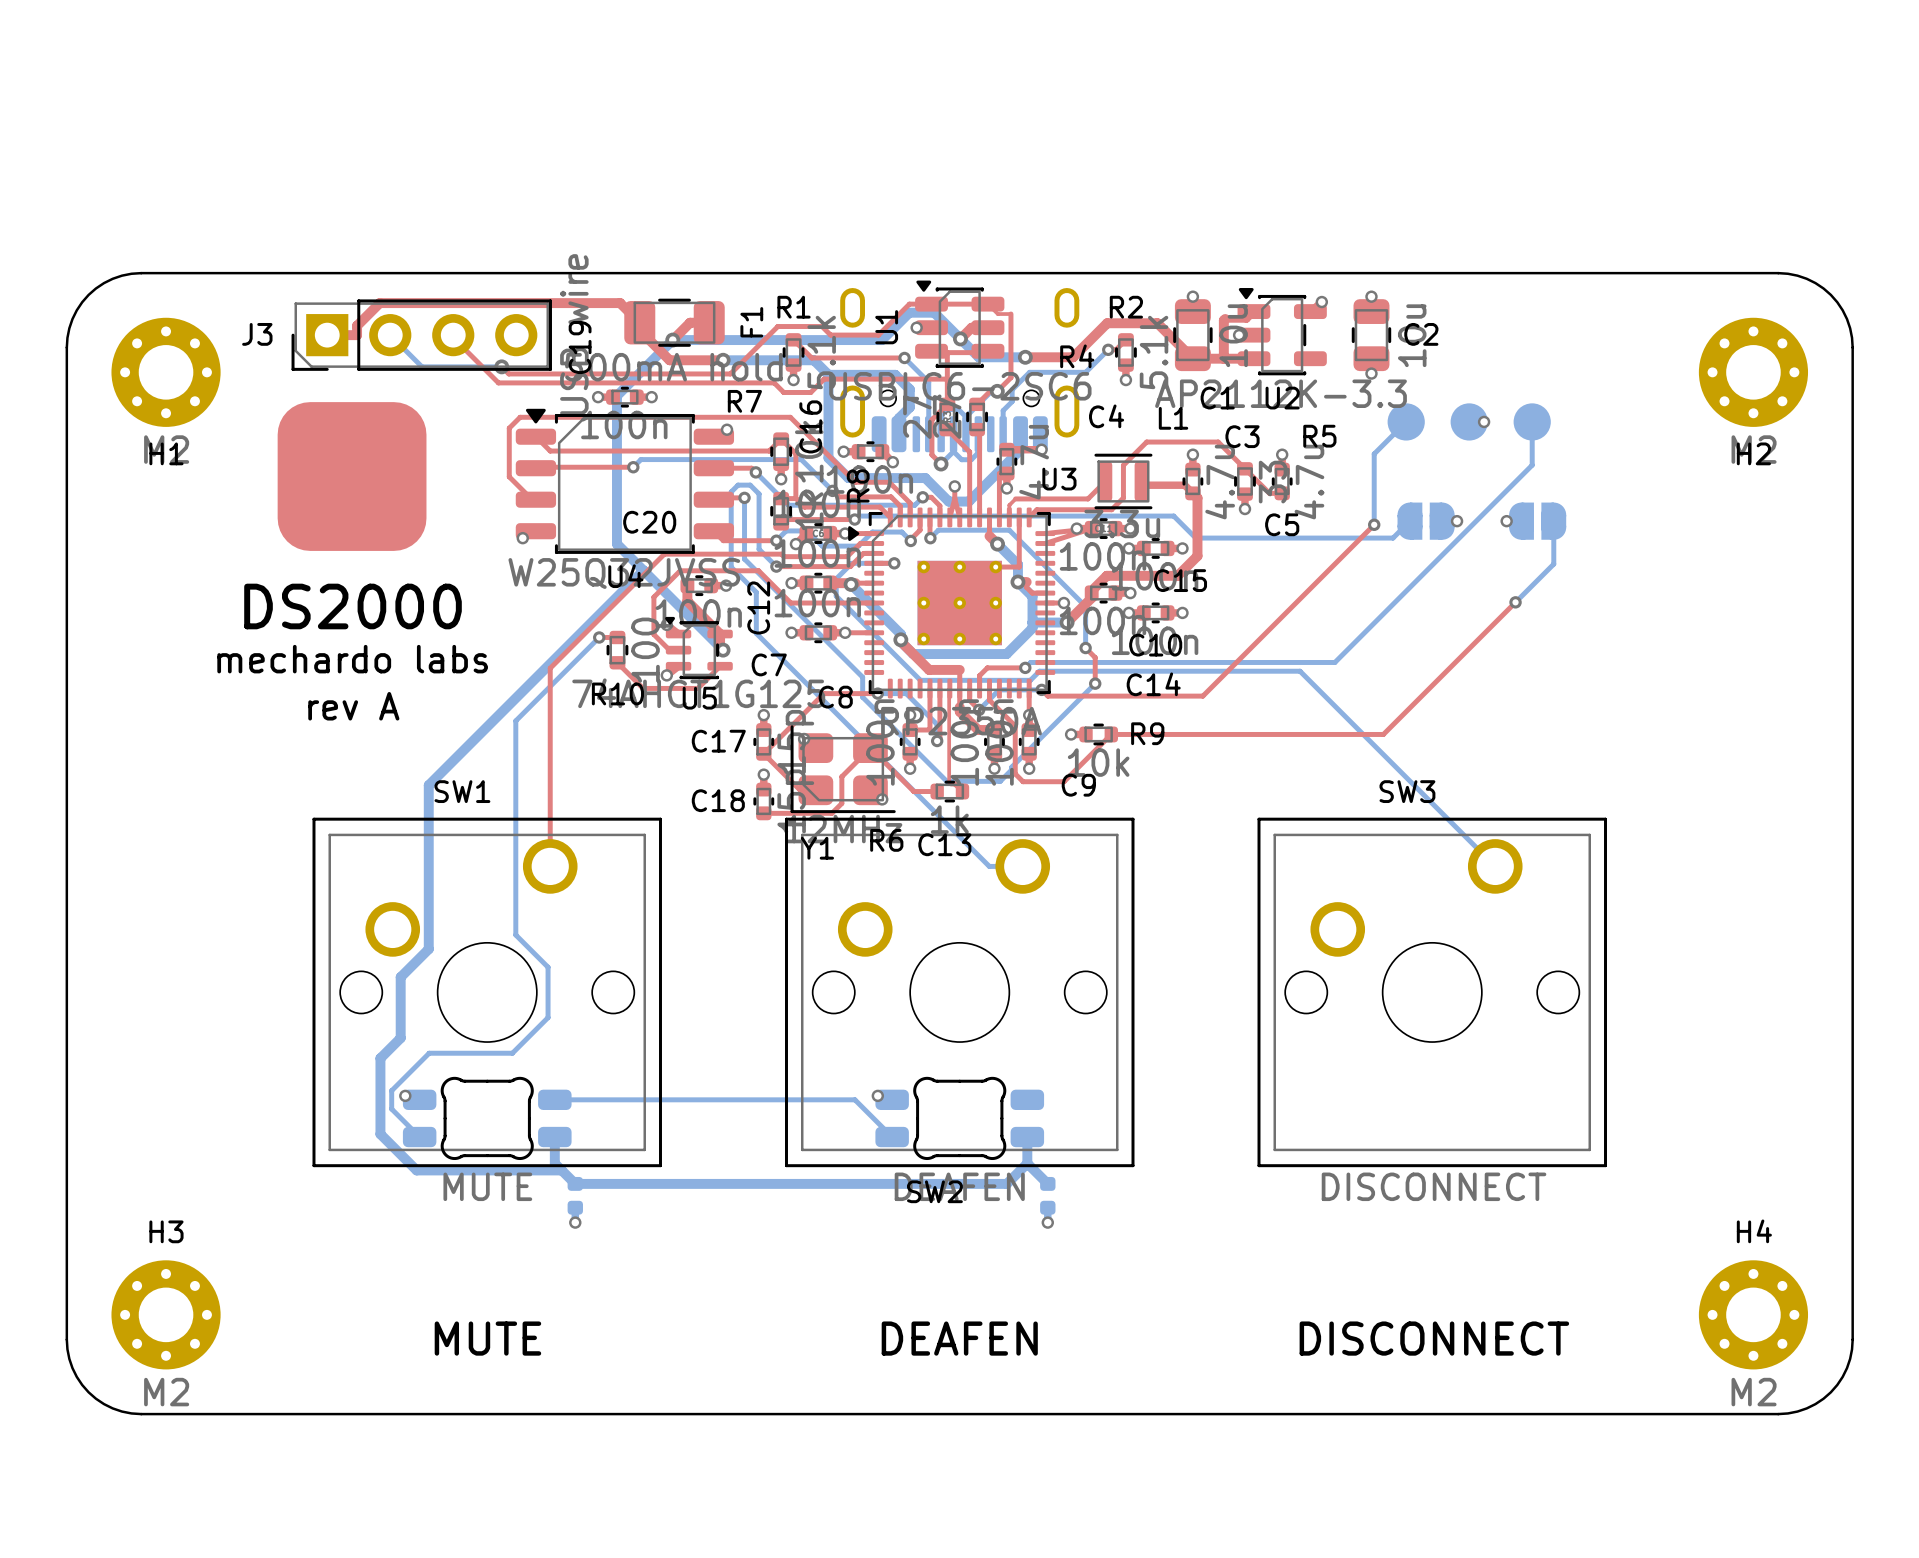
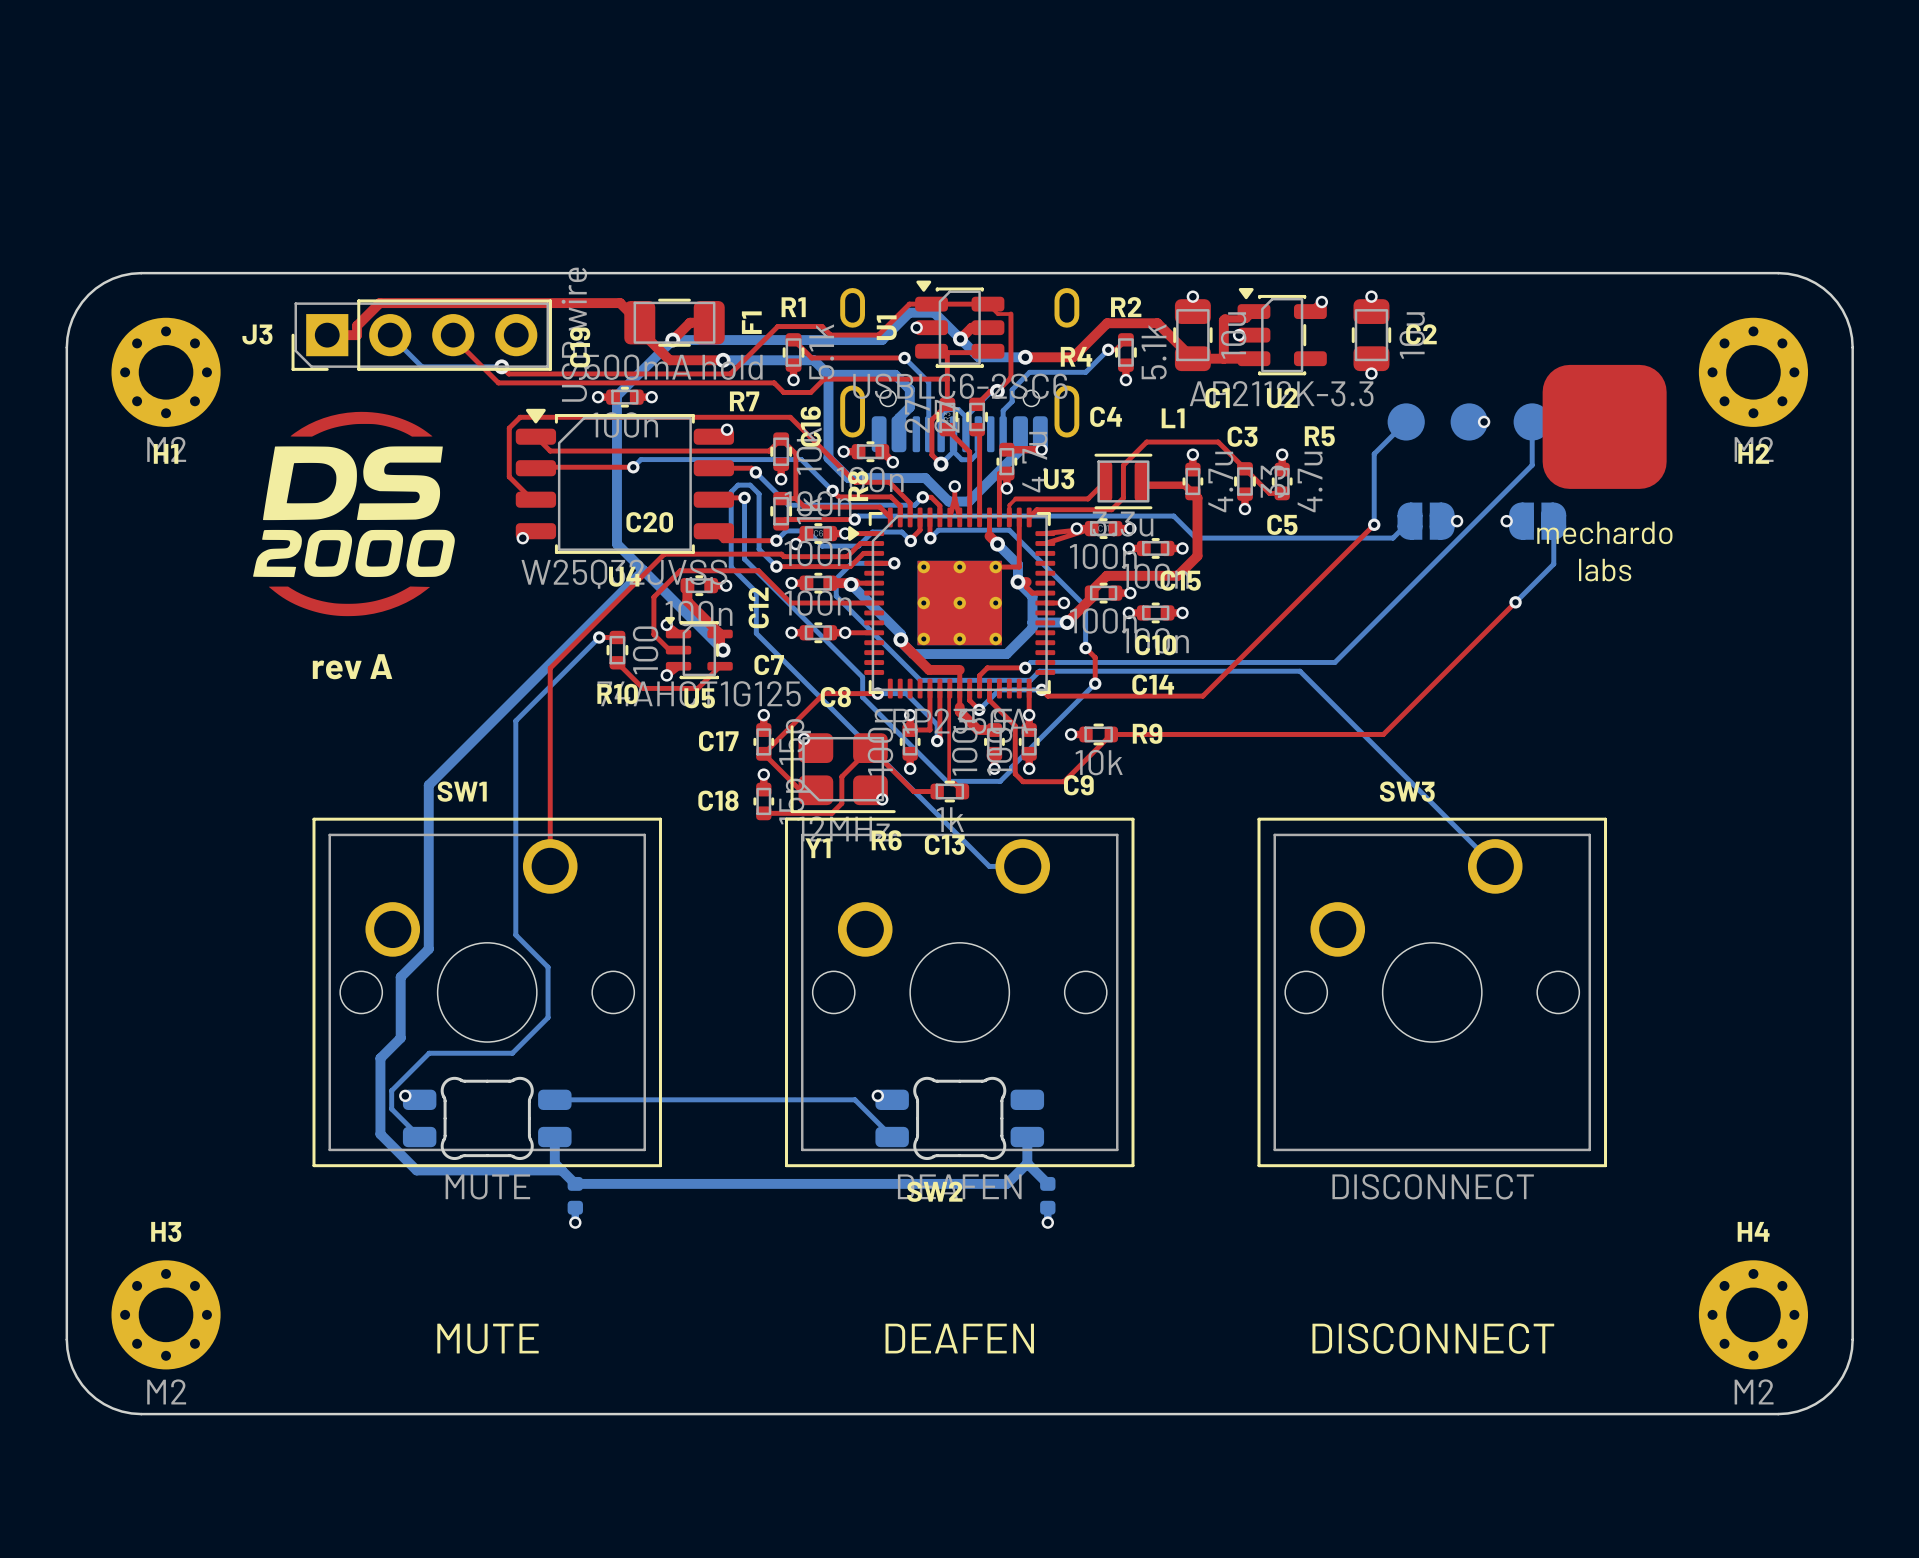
drawing: none -> [1542, 364, 1667, 489]
drawing: [277, 402, 427, 551] -> none
drawing: none -> [253, 411, 455, 617]
text: none -> mechardo (1604, 532)
text: none -> labs (1605, 570)
text: DS2000 (353, 606) -> none
text: mechardo labs (352, 659) -> rev A (352, 666)
text: rev A (353, 706) -> none

